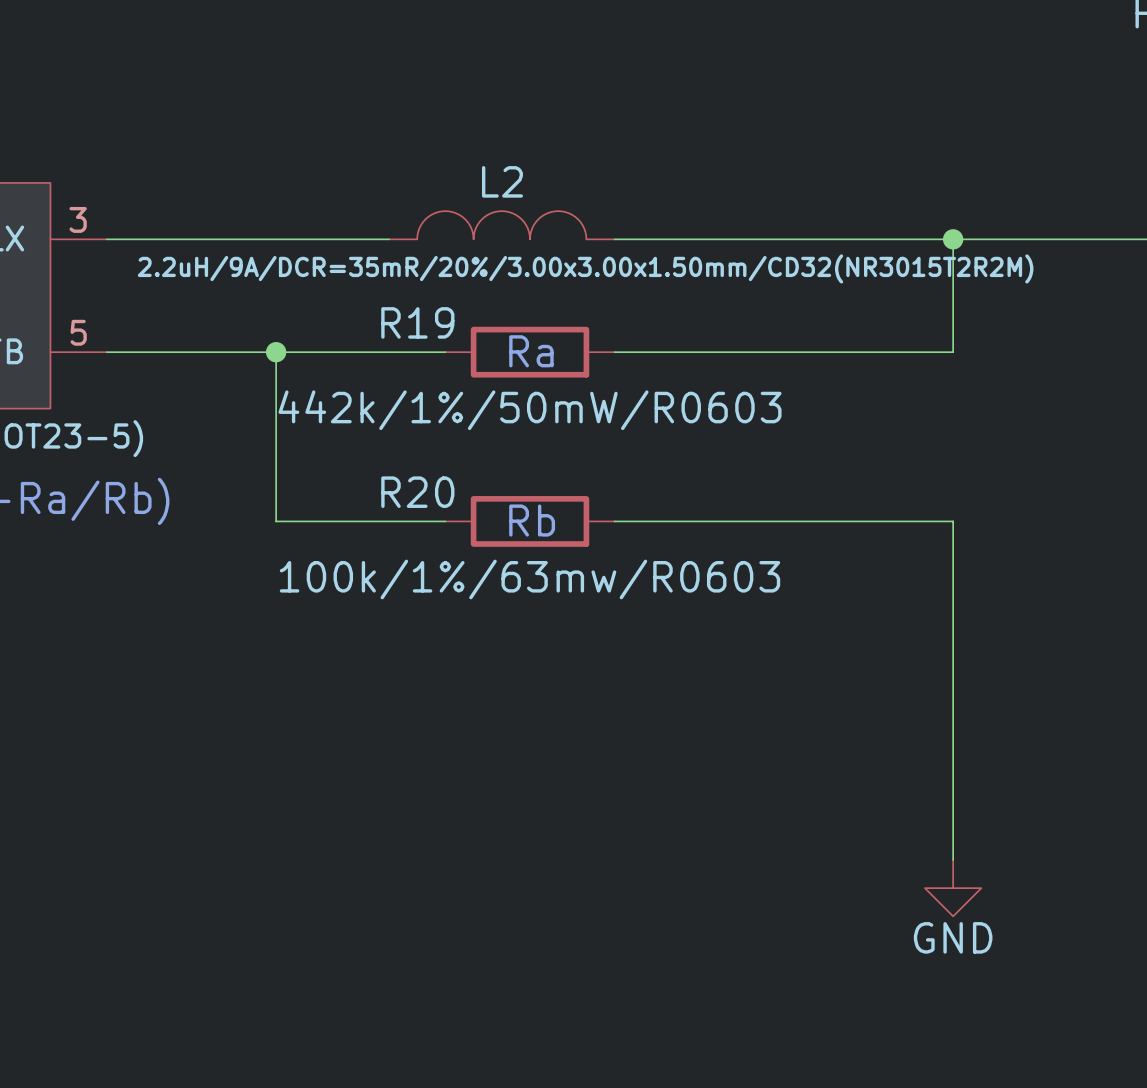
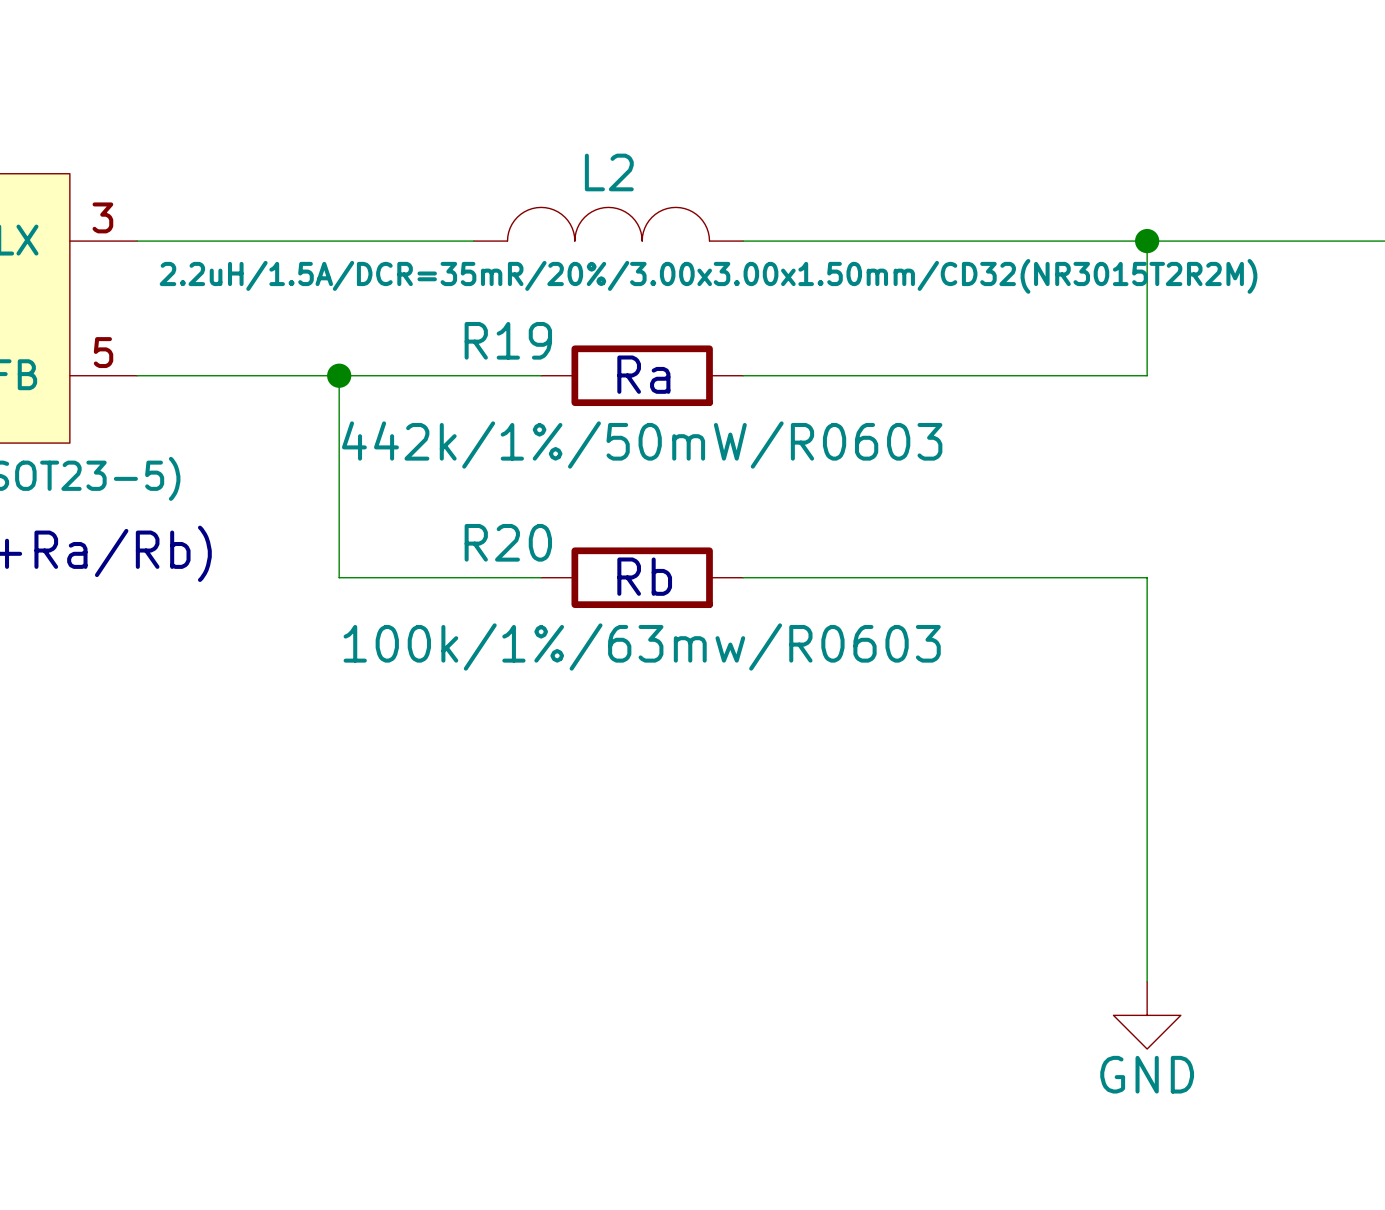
L2 value: 2.2uH/9A/DCR=35mR/20%/3.00x3.00x1.50mm/CD32(NR3015T2R2M) (585, 268) -> 2.2uH/1.5A/DCR=35mR/20%/3.00x3.00x1.50mm/CD32(NR3015T2R2M) (708, 276)

